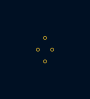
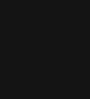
part: (45, 49) -> none

